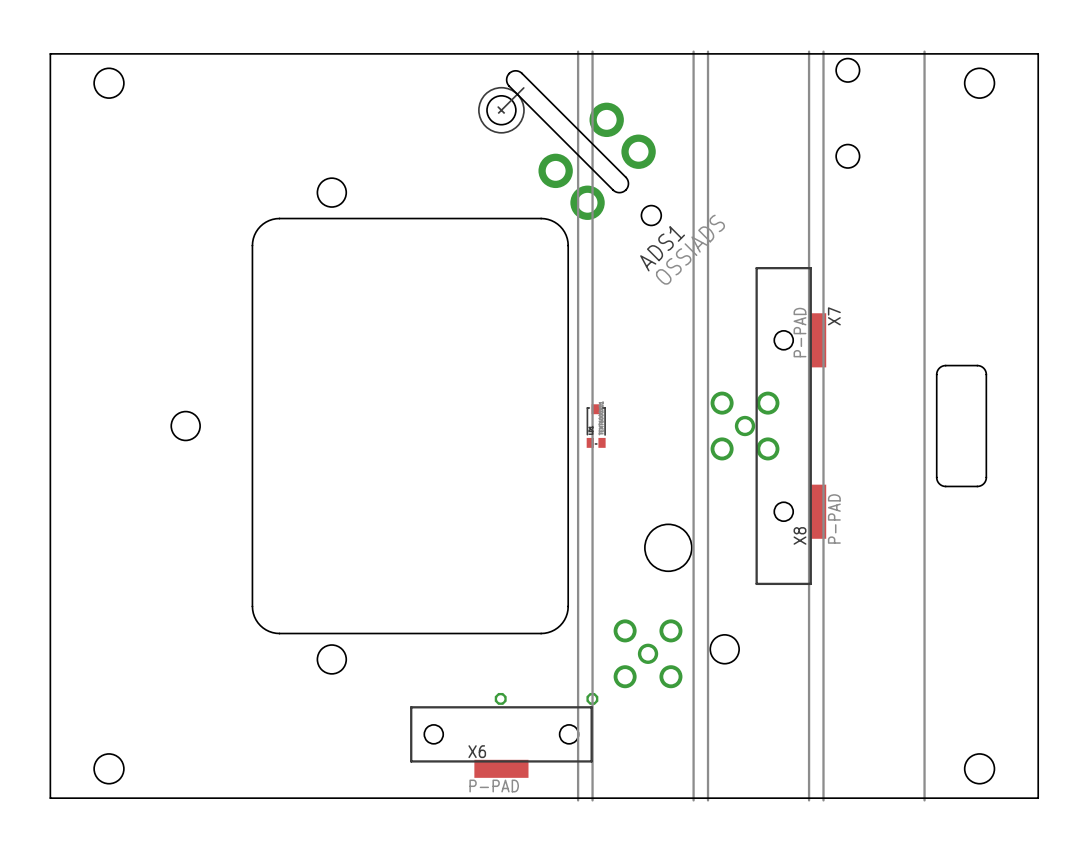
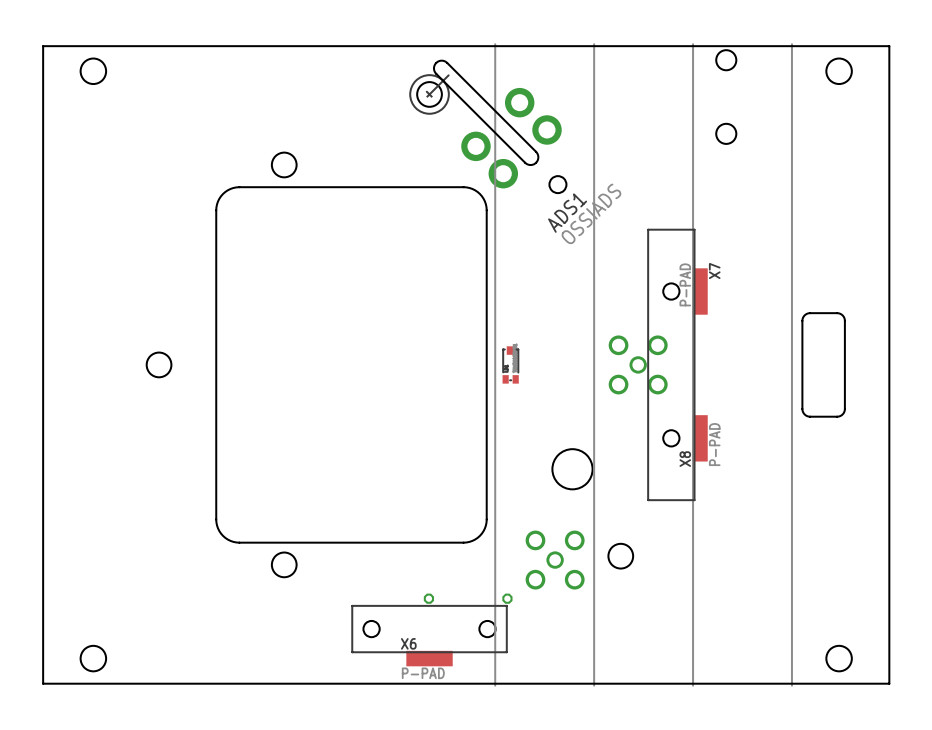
line: (592, 51) (592, 800) -> none
line: (708, 51) (708, 800) -> none
line: (823, 51) (823, 800) -> none

